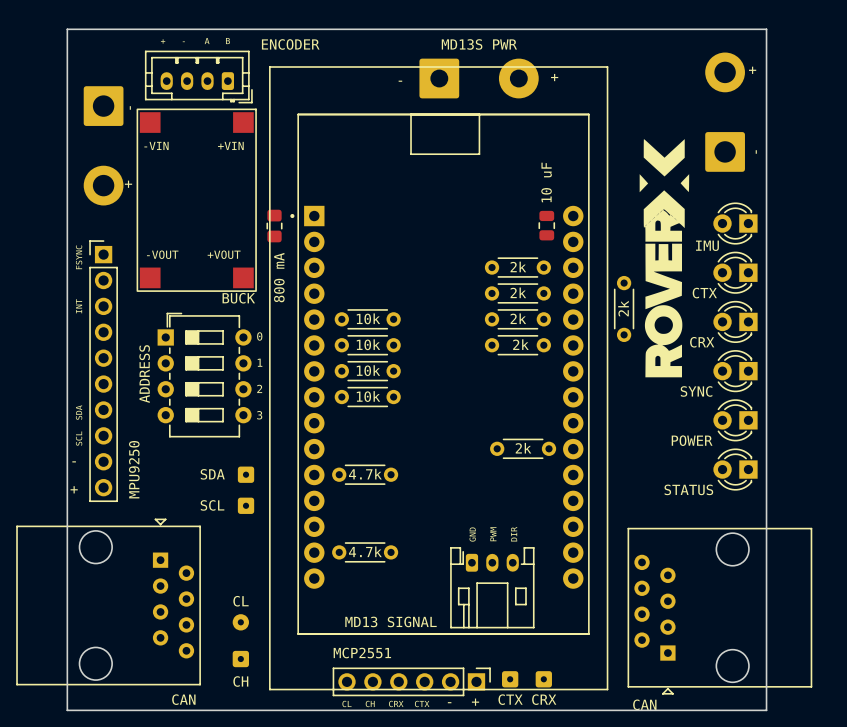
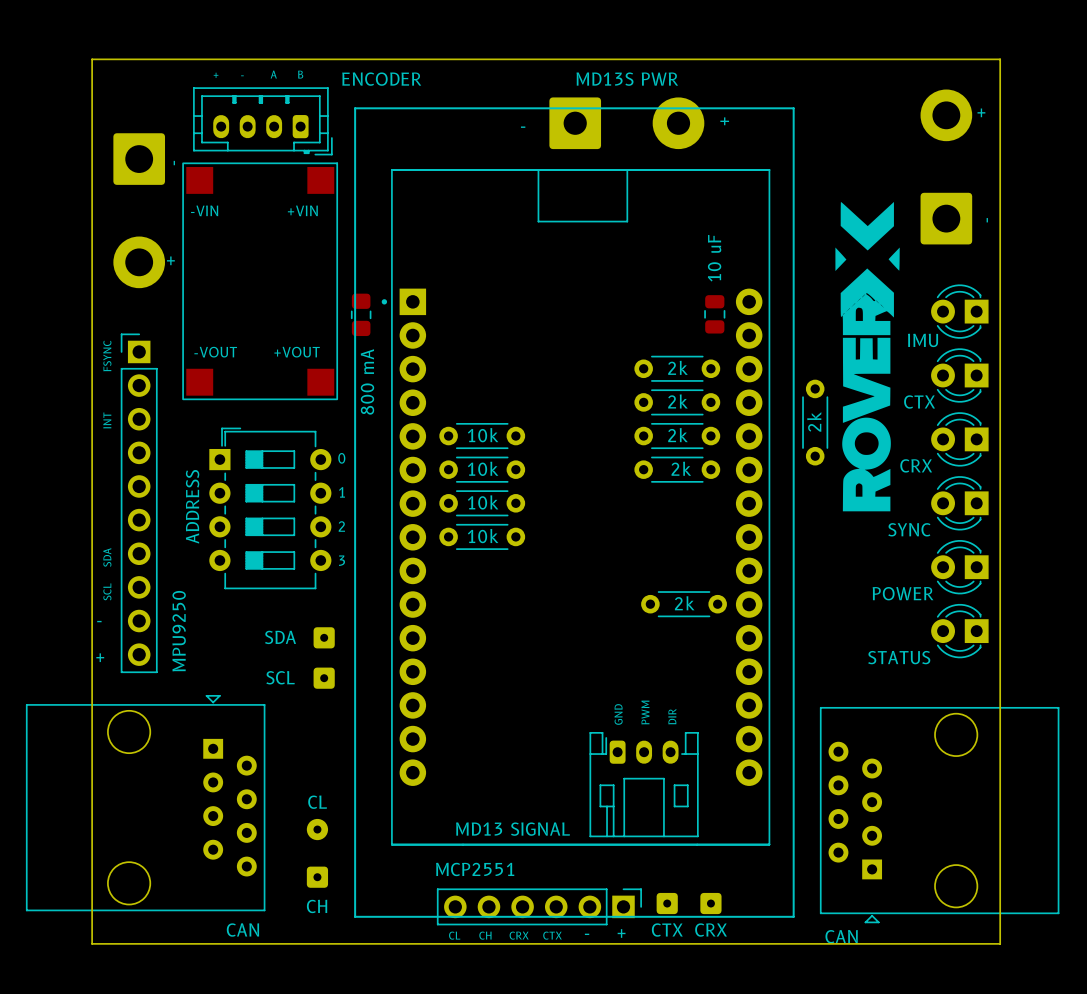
part value: BUCK (238, 298) -> none
part: 4.7k (365, 474) -> none
part: 4.7k (365, 552) -> none

